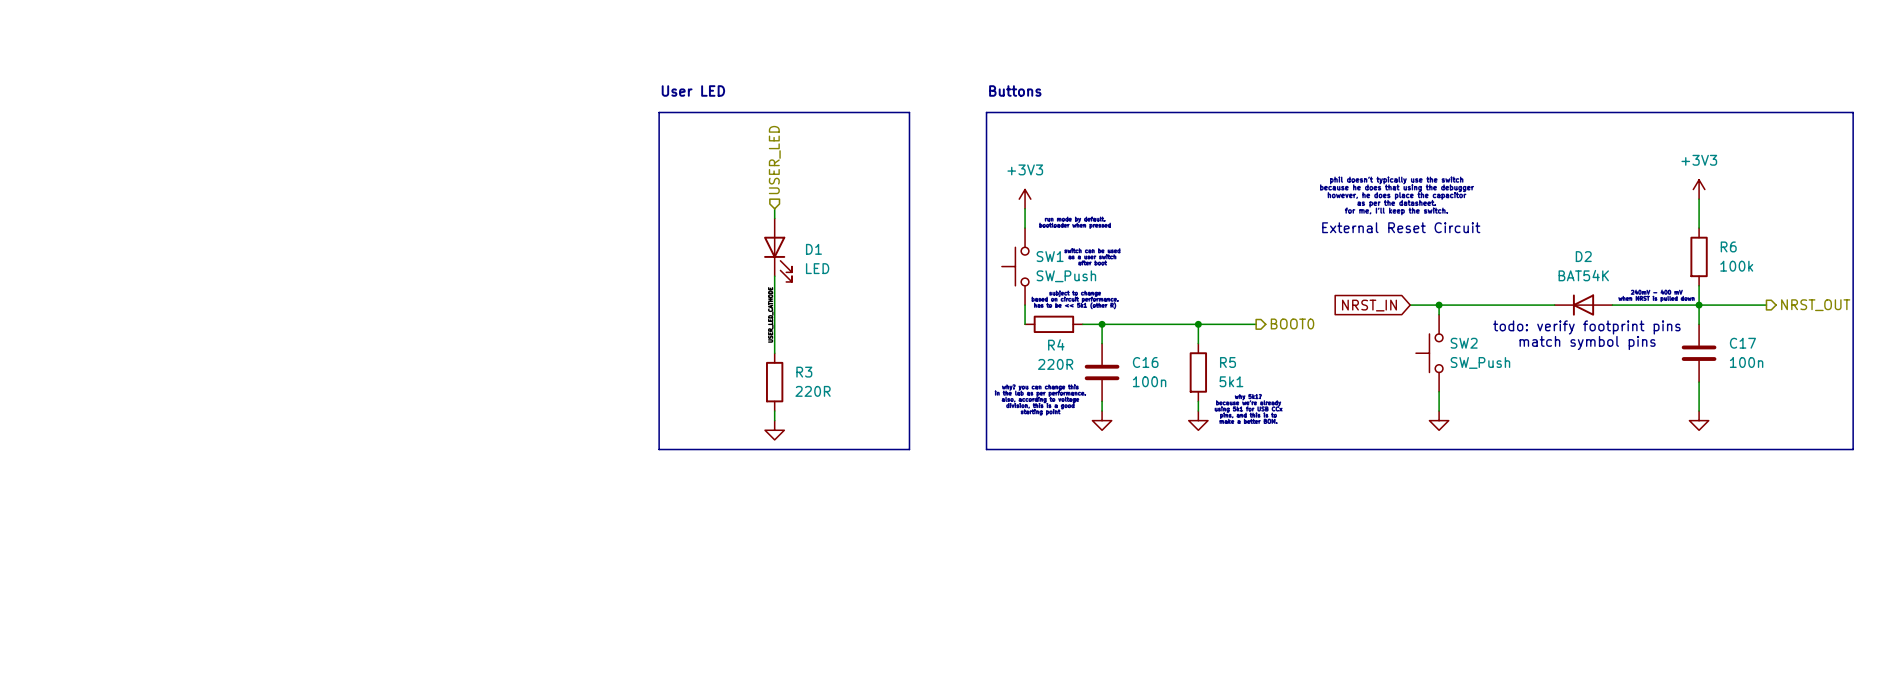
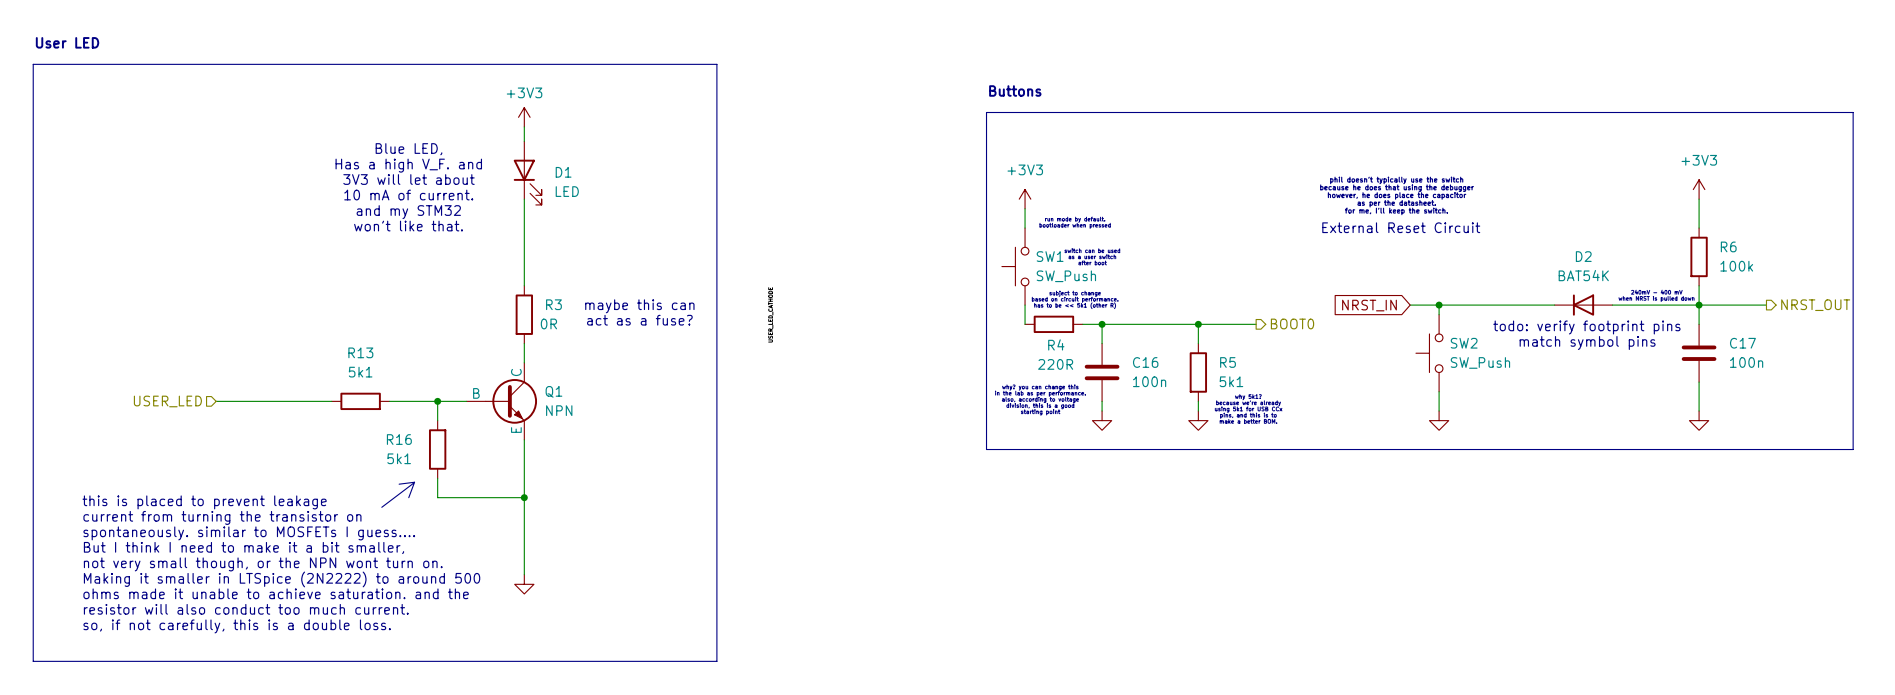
text: none -> User LED (67, 42)
line: none -> (33, 64) (716, 64) (716, 661) (33, 661) (33, 64)
text: User LED (693, 90) -> none
line: (659, 112) (909, 112) (909, 449) (659, 449) (659, 112) -> none
power symbol: none -> +3V3 (524, 117)
wire: none -> (524, 126) (524, 141)
text: none -> Blue LED, (409, 149)
hierarchical label: USER_LED (774, 160) -> none
text: none -> Has a high V_F. and (408, 165)
text: none -> 3V3 will let about (409, 179)
text: none -> 10 mA of current. (408, 195)
wire: none -> (524, 199) (524, 285)
wire: (774, 208) (774, 218) -> none
text: none -> and my STM32 (408, 212)
text: none -> won't like that. (408, 226)
D1 position: (778, 250) -> (527, 173)
wire: (774, 276) (774, 353) -> none
text: none -> maybe this can (639, 306)
text: none -> act as a fuse? (639, 320)
wire: none -> (524, 343) (524, 362)
R3 position: (774, 382) -> (524, 314)
R3 value: 220R (813, 391) -> 0R (548, 323)
hierarchical label: none -> USER_LED (167, 401)
wire: none -> (216, 401) (331, 401)
R13: none -> 5k1 (360, 401)
wire: none -> (389, 401) (466, 401)
wire: none -> (437, 401) (437, 420)
junction: none -> (437, 401)
Q1: none -> NPN (501, 401)
wire: (774, 411) (774, 420) -> none
power symbol: (774, 430) -> none
wire: none -> (524, 439) (524, 574)
R16: none -> 5k1 (437, 449)
wire: none -> (437, 478) (437, 497) (524, 497)
line: none -> (413, 483) (381, 507)
line: none -> (399, 484) (414, 482) (408, 497)
junction: none -> (524, 497)
text: none -> this is placed to prevent leakage (204, 502)
text: none -> current from turning the transistor on (222, 517)
text: none -> spontaneously. similar to MOSFETs I guess.... (249, 533)
text: none -> But I think I need to make it a bit smaller, (244, 547)
text: none -> not very small though, or the NPN wont turn on. (263, 564)
text: none -> Making it smaller in LTSpice (2N2222) to around 500 (282, 579)
power symbol: none -> (524, 584)
text: none -> ohms made it unable to achieve saturation. and the (276, 593)
text: none -> resistor will also conduct too much current. (246, 609)
text: none -> so, if not carefully, this is a double loss. (237, 626)

